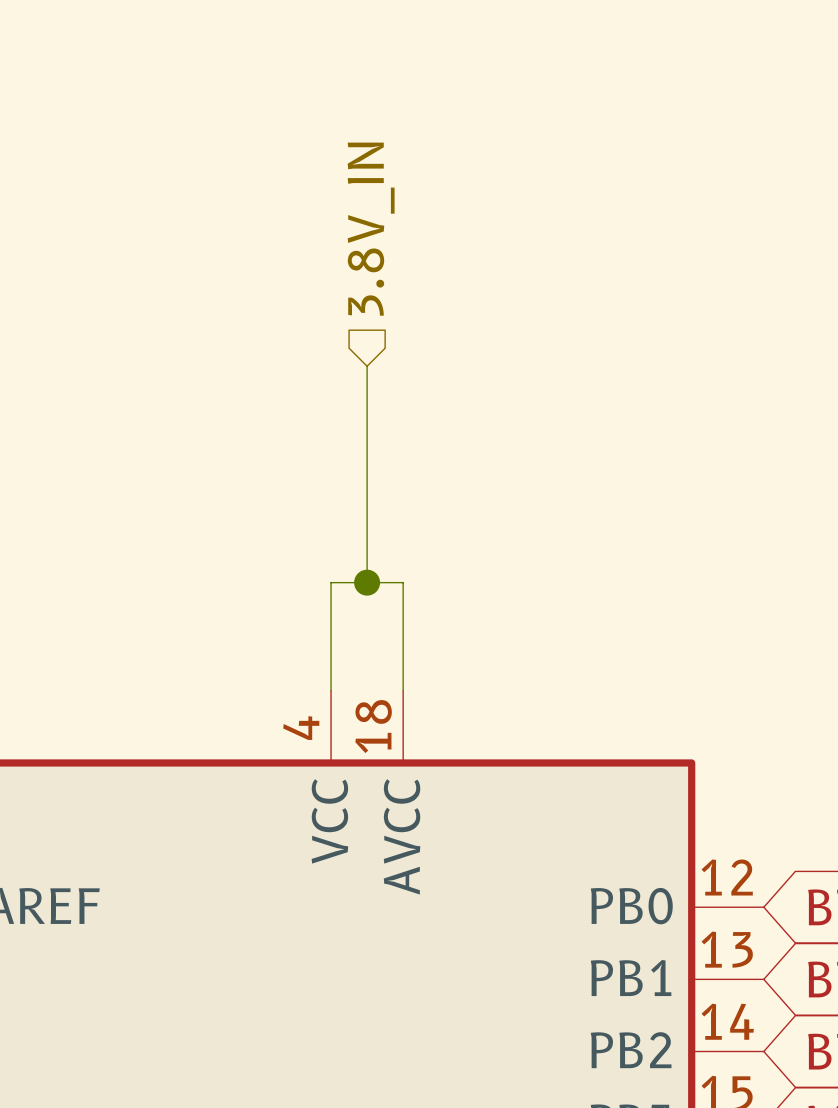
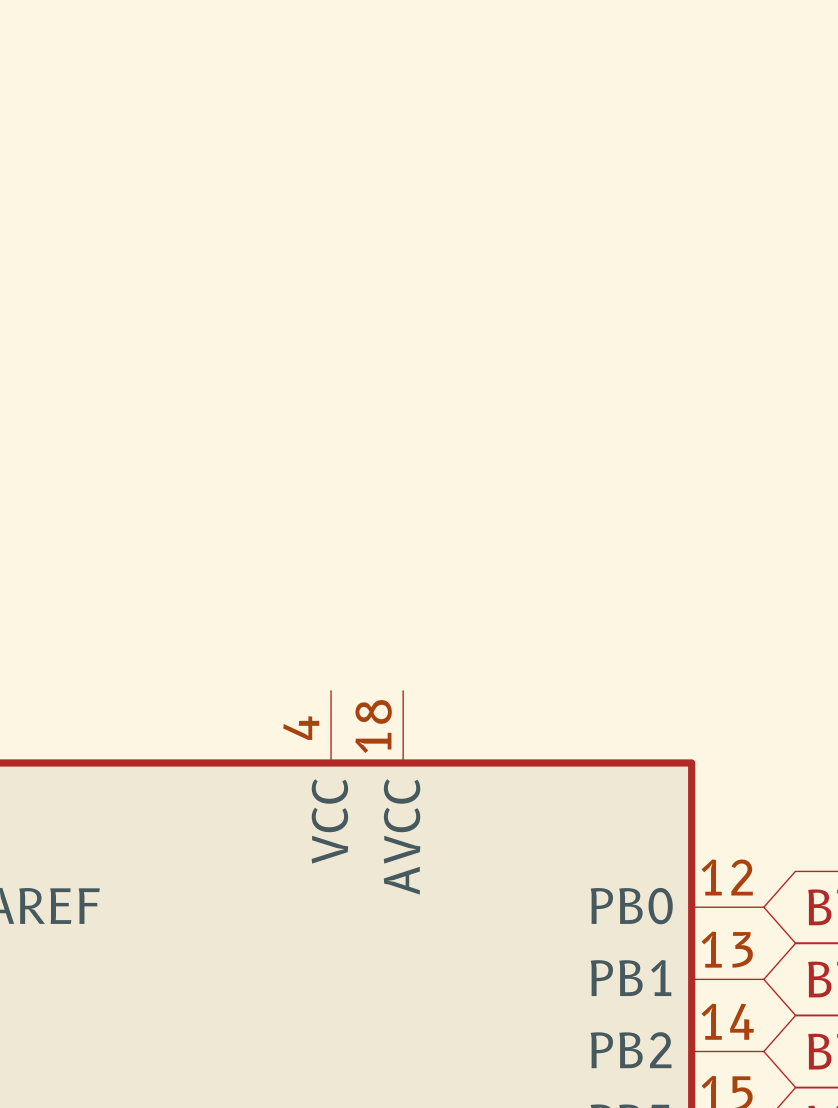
hierarchical label: 3.8V_IN (371, 229) -> none
wire: (367, 366) (367, 582) -> none
junction: (367, 582) -> none
wire: (331, 690) (331, 582) (403, 582) (403, 690) -> none

